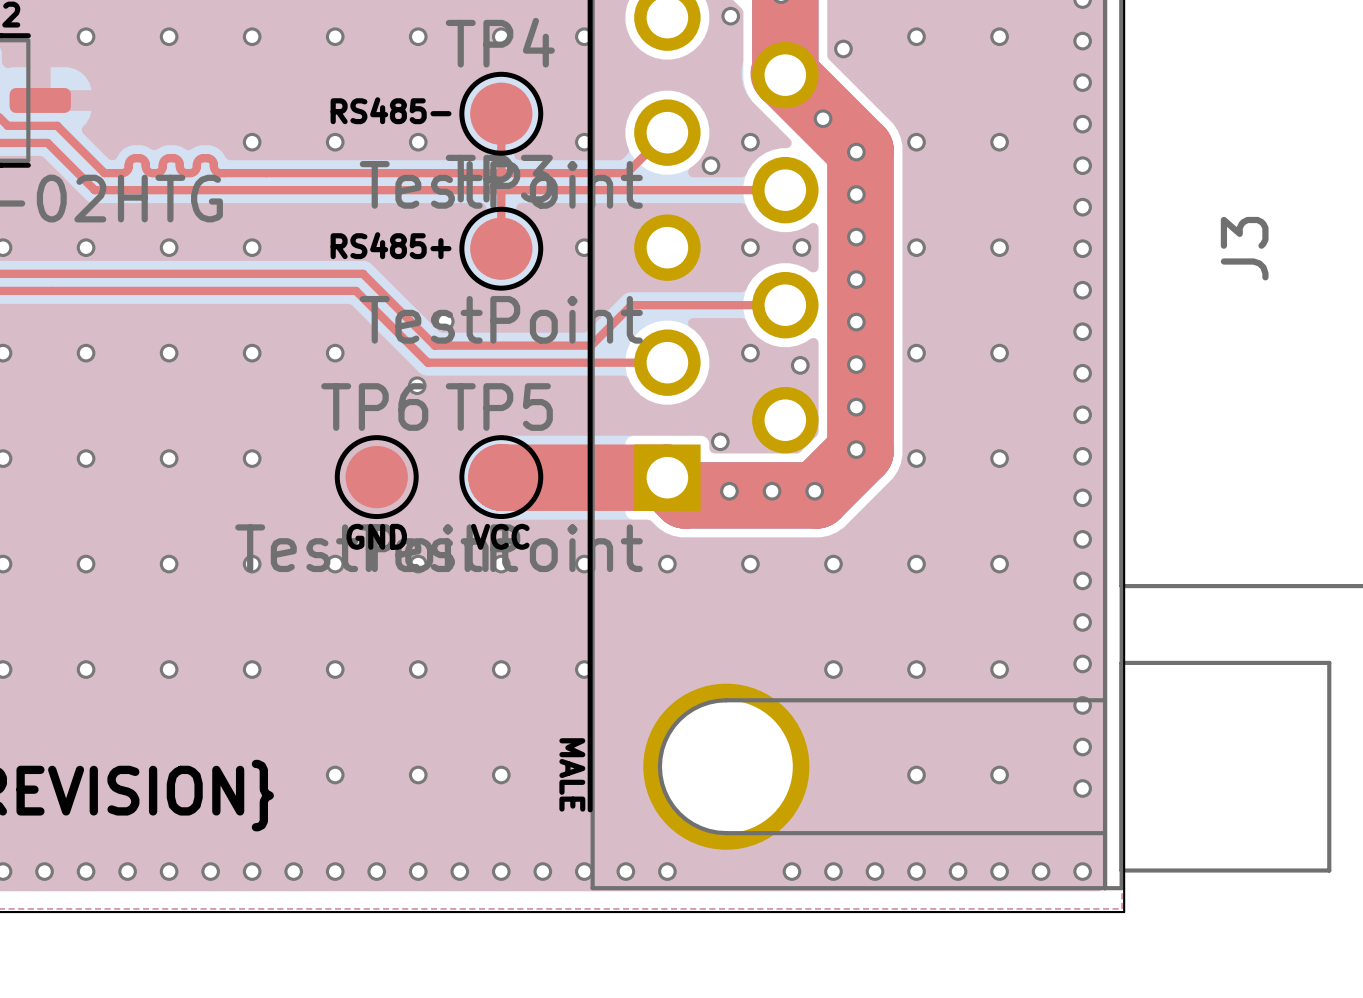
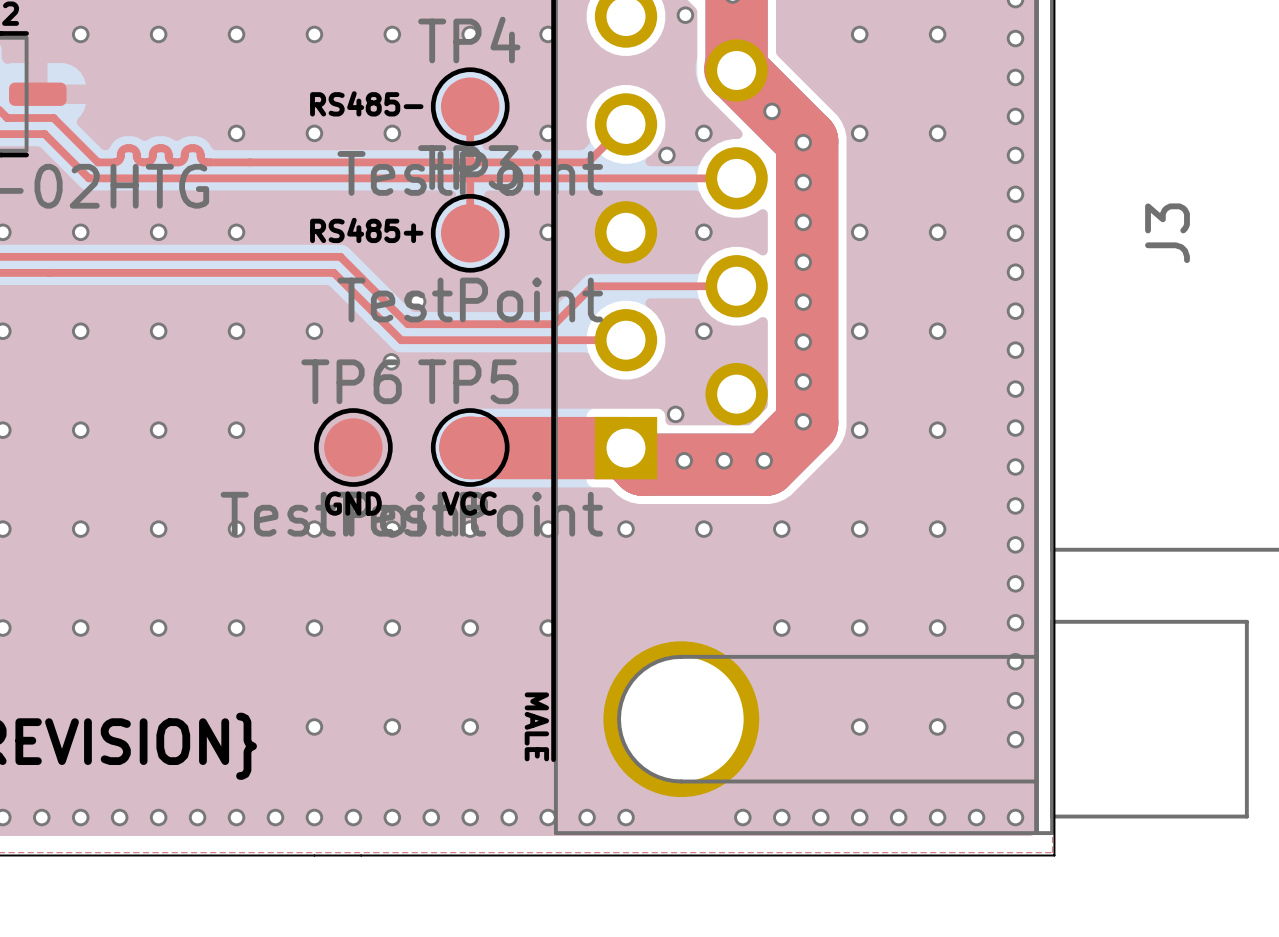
via: (843, 48) -> none
via: (801, 247) -> none
via: (800, 365) -> none

